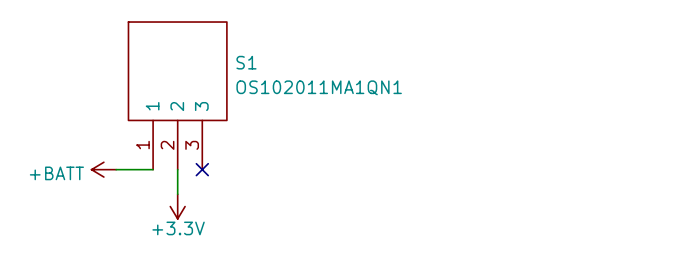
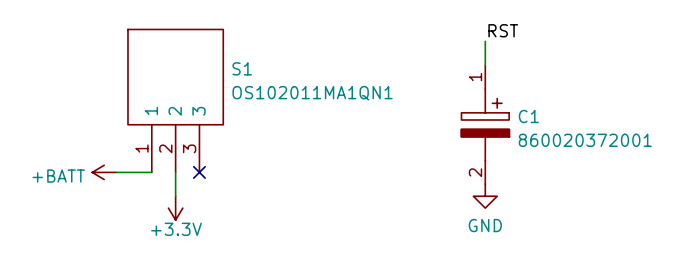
label: none -> RST (503, 30)
wire: none -> (485, 41) (485, 65)
C1: none -> 860020372001 (485, 124)
power symbol: none -> GND (485, 196)

